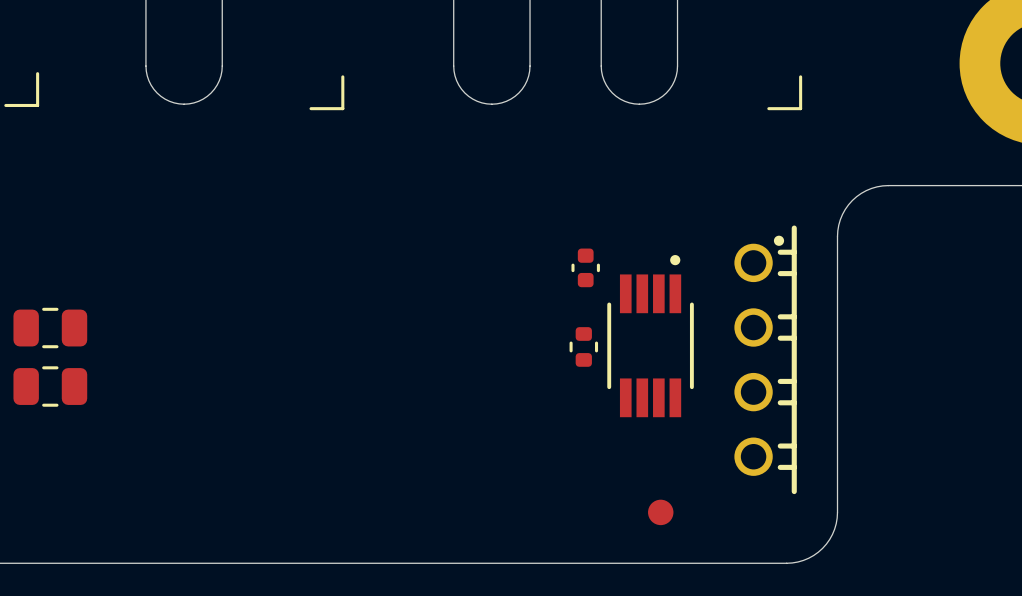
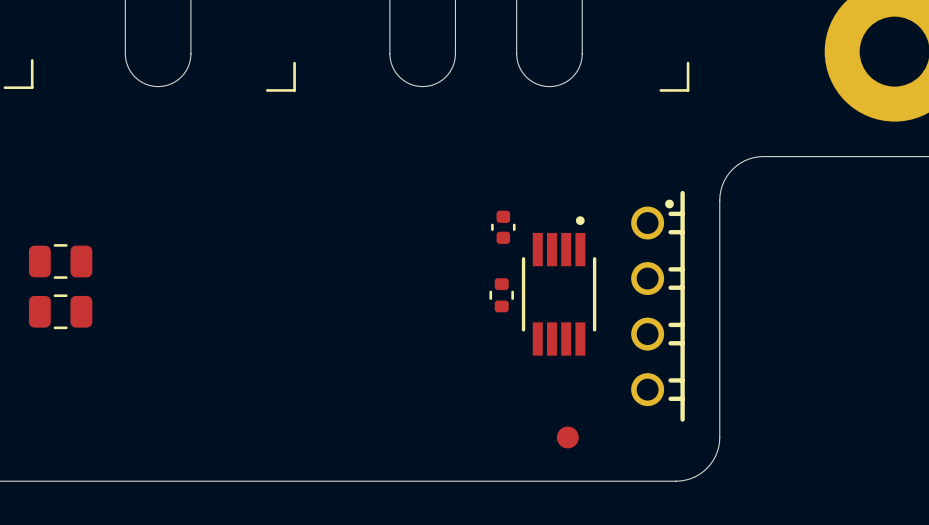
part: none -> (60, 261)
part: (50, 328) -> none
part: none -> (60, 311)
part: (50, 386) -> none

